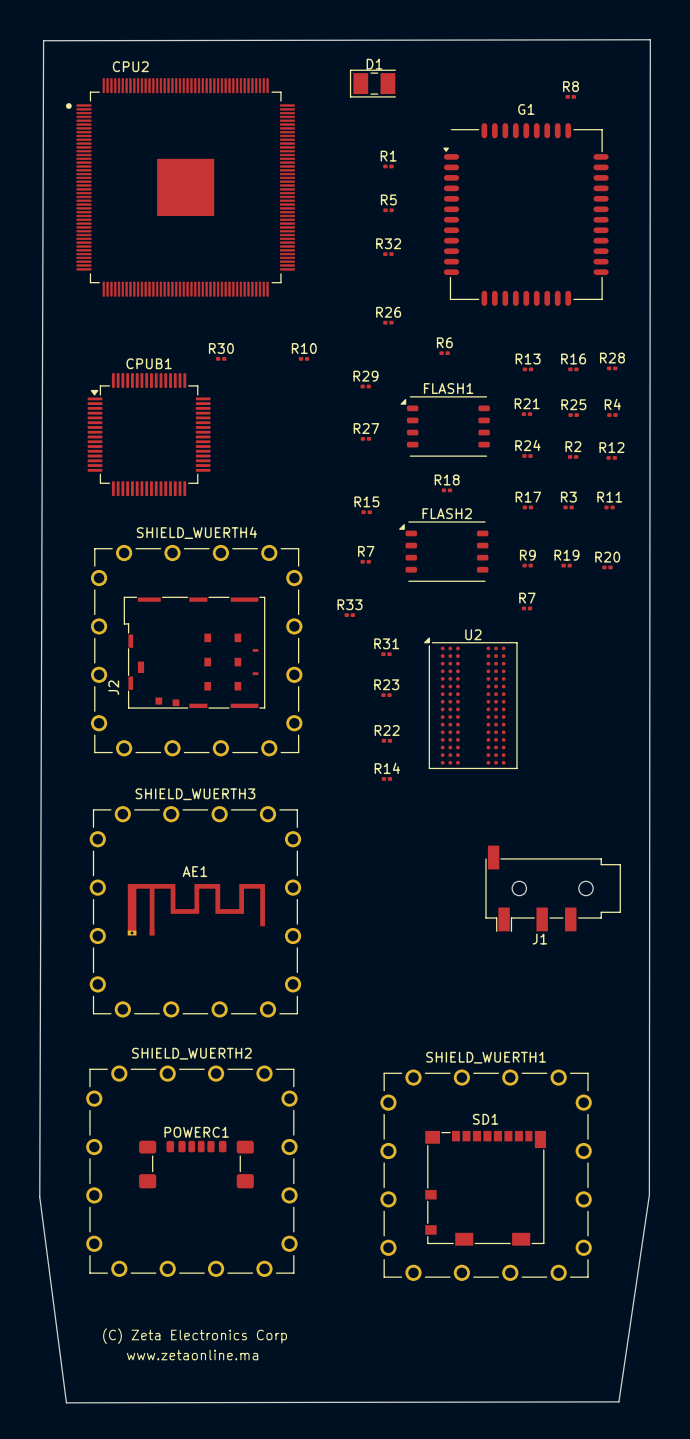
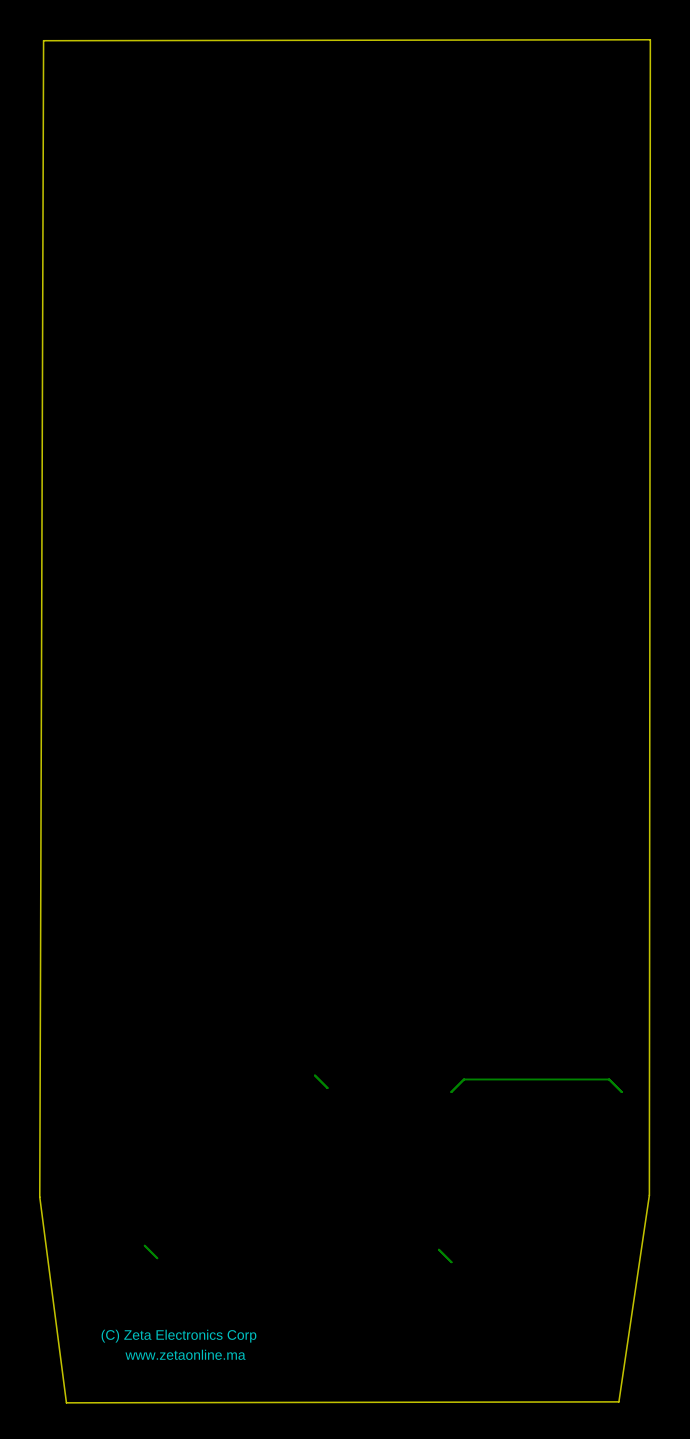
D1: (372, 83) -> none
R8: (570, 96) -> none
R1: (388, 166) -> none
CPU2: (180, 187) -> none
R5: (388, 210) -> none
G1: (525, 214) -> none
R32: (388, 254) -> none
R26: (388, 322) -> none
R6: (444, 353) -> none
R30: (221, 358) -> none
R10: (304, 358) -> none
R28: (612, 368) -> none
R13: (527, 369) -> none
R16: (573, 369) -> none
R29: (365, 386) -> none
R21: (526, 414) -> none
R25: (573, 415) -> none
R4: (612, 415) -> none
FLASH1: (445, 426) -> none
CPUB1: (149, 434) -> none
R27: (365, 438) -> none
R24: (527, 456) -> none
R2: (573, 456) -> none
R12: (611, 457) -> none
R18: (446, 490) -> none
R17: (527, 507) -> none
R3: (568, 507) -> none
R11: (609, 507) -> none
R15: (366, 512) -> none
FLASH2: (443, 551) -> none
R7: (365, 561) -> none
R9: (527, 565) -> none
R19: (566, 565) -> none
R20: (607, 567) -> none
R7: (526, 608) -> none
R33: (349, 615) -> none
SHIELD_WUERTH4: (196, 650) -> none
J2: (194, 652) -> none
R31: (386, 654) -> none
R23: (386, 695) -> none
U2: (470, 703) -> none
R22: (386, 740) -> none
R14: (386, 778) -> none
J1: (553, 888) -> none
AE1: (196, 909) -> none
SHIELD_WUERTH3: (195, 911) -> none
bottom track: none -> (314, 1075) (327, 1088)
bottom track: none -> (609, 1079) (463, 1079) (451, 1092)
bottom track: none -> (609, 1079) (621, 1092) (609, 1079)
POWERC1: (196, 1164) -> none
SHIELD_WUERTH2: (191, 1171) -> none
SHIELD_WUERTH1: (486, 1175) -> none
SD1: (485, 1188) -> none
bottom track: none -> (144, 1245) (157, 1258)
bottom track: none -> (438, 1249) (451, 1262)

